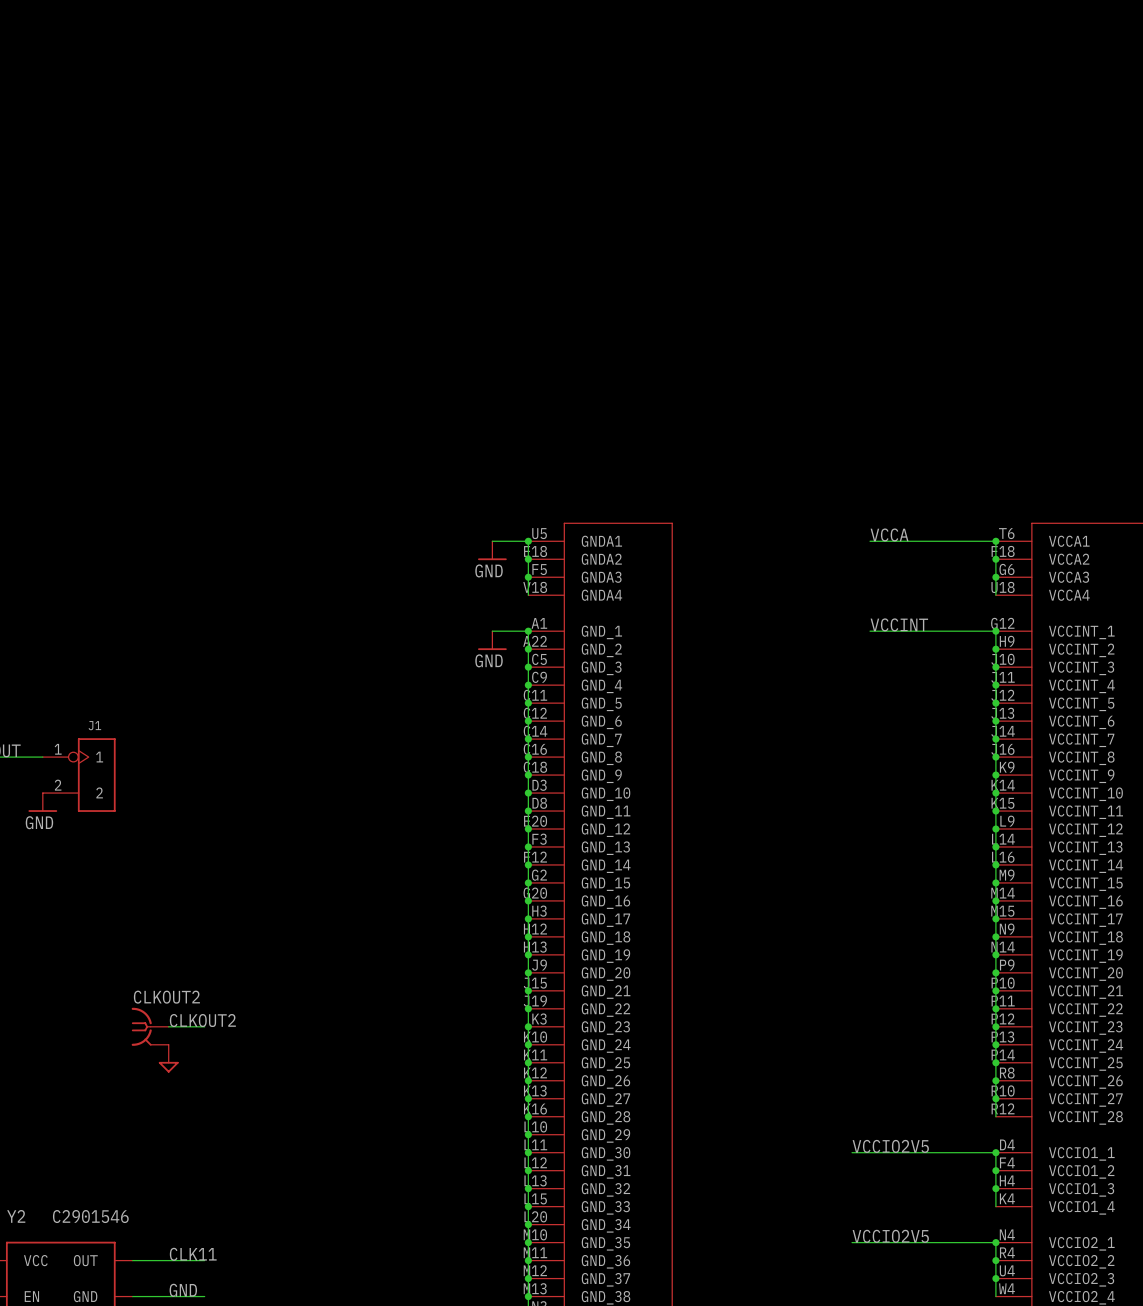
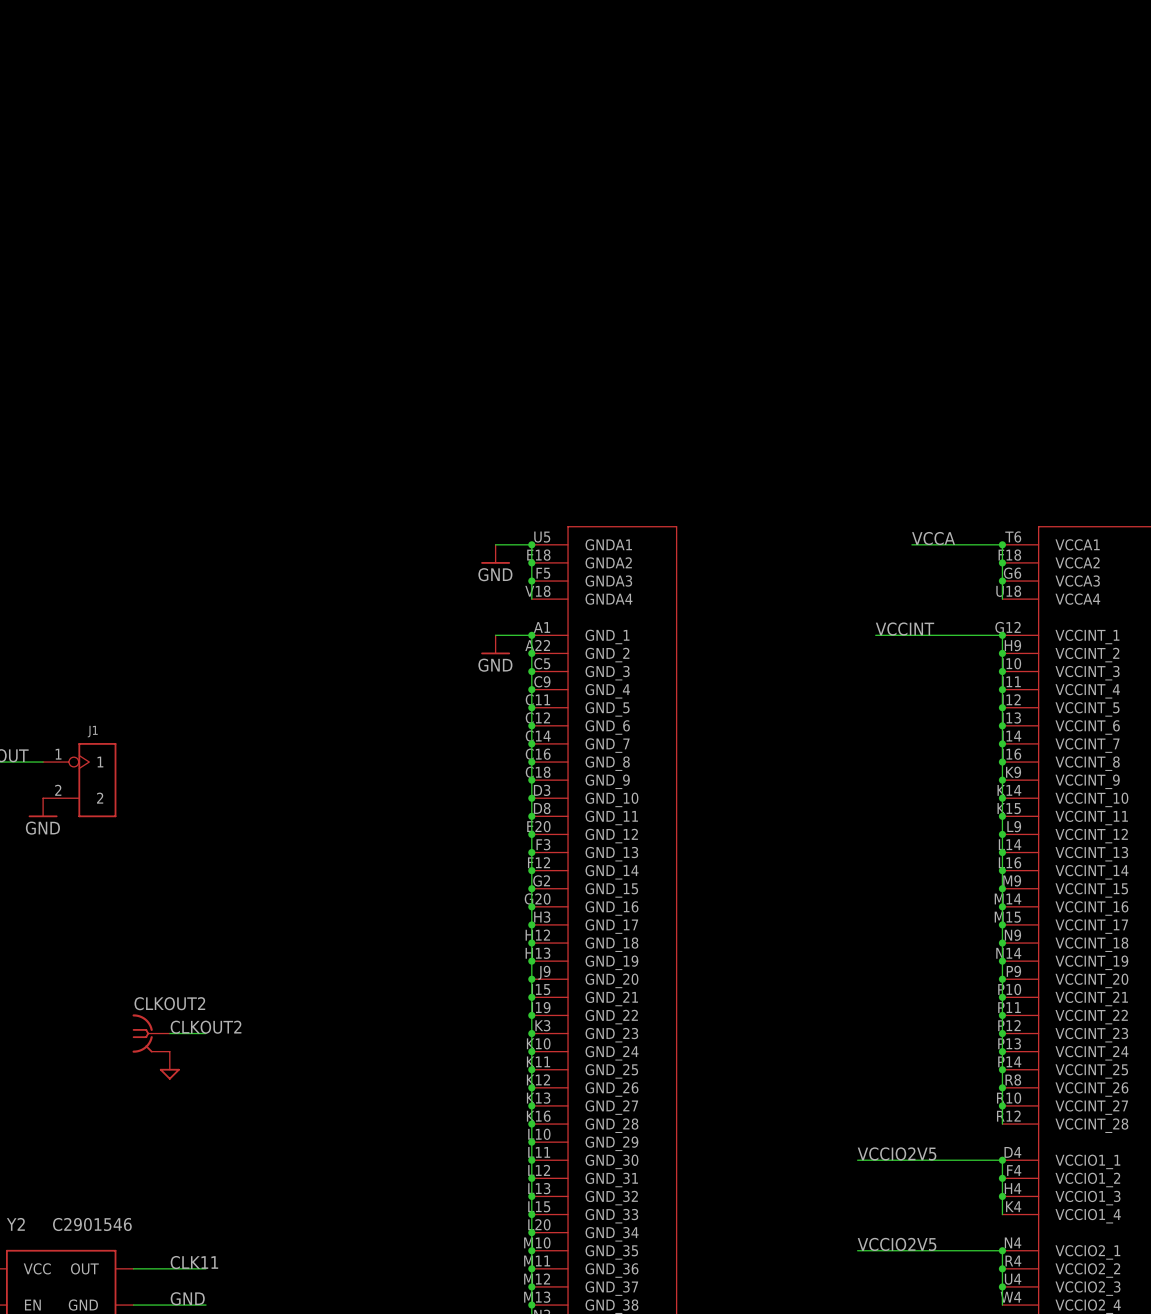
label position: VCCA (889, 534) -> VCCA (933, 538)
wire: (870, 541) (906, 541) -> none

